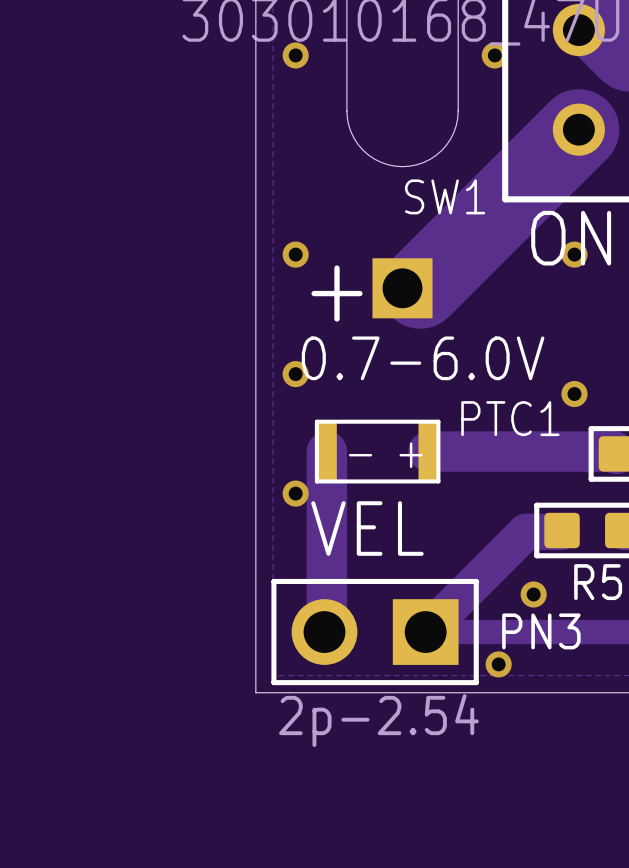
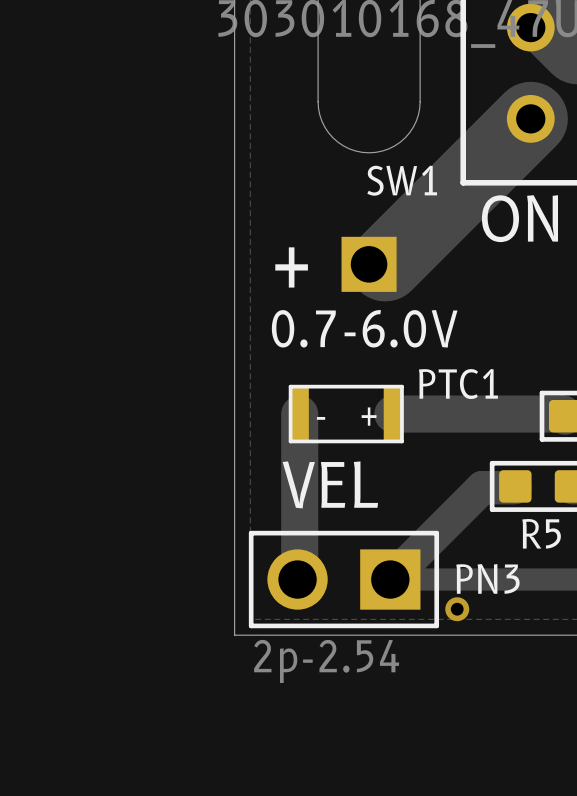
via: (295, 55) -> none
via: (494, 55) -> none
via: (295, 254) -> none
via: (574, 254) -> none
via: (295, 374) -> none
via: (574, 394) -> none
via: (295, 493) -> none
via: (533, 594) -> none

